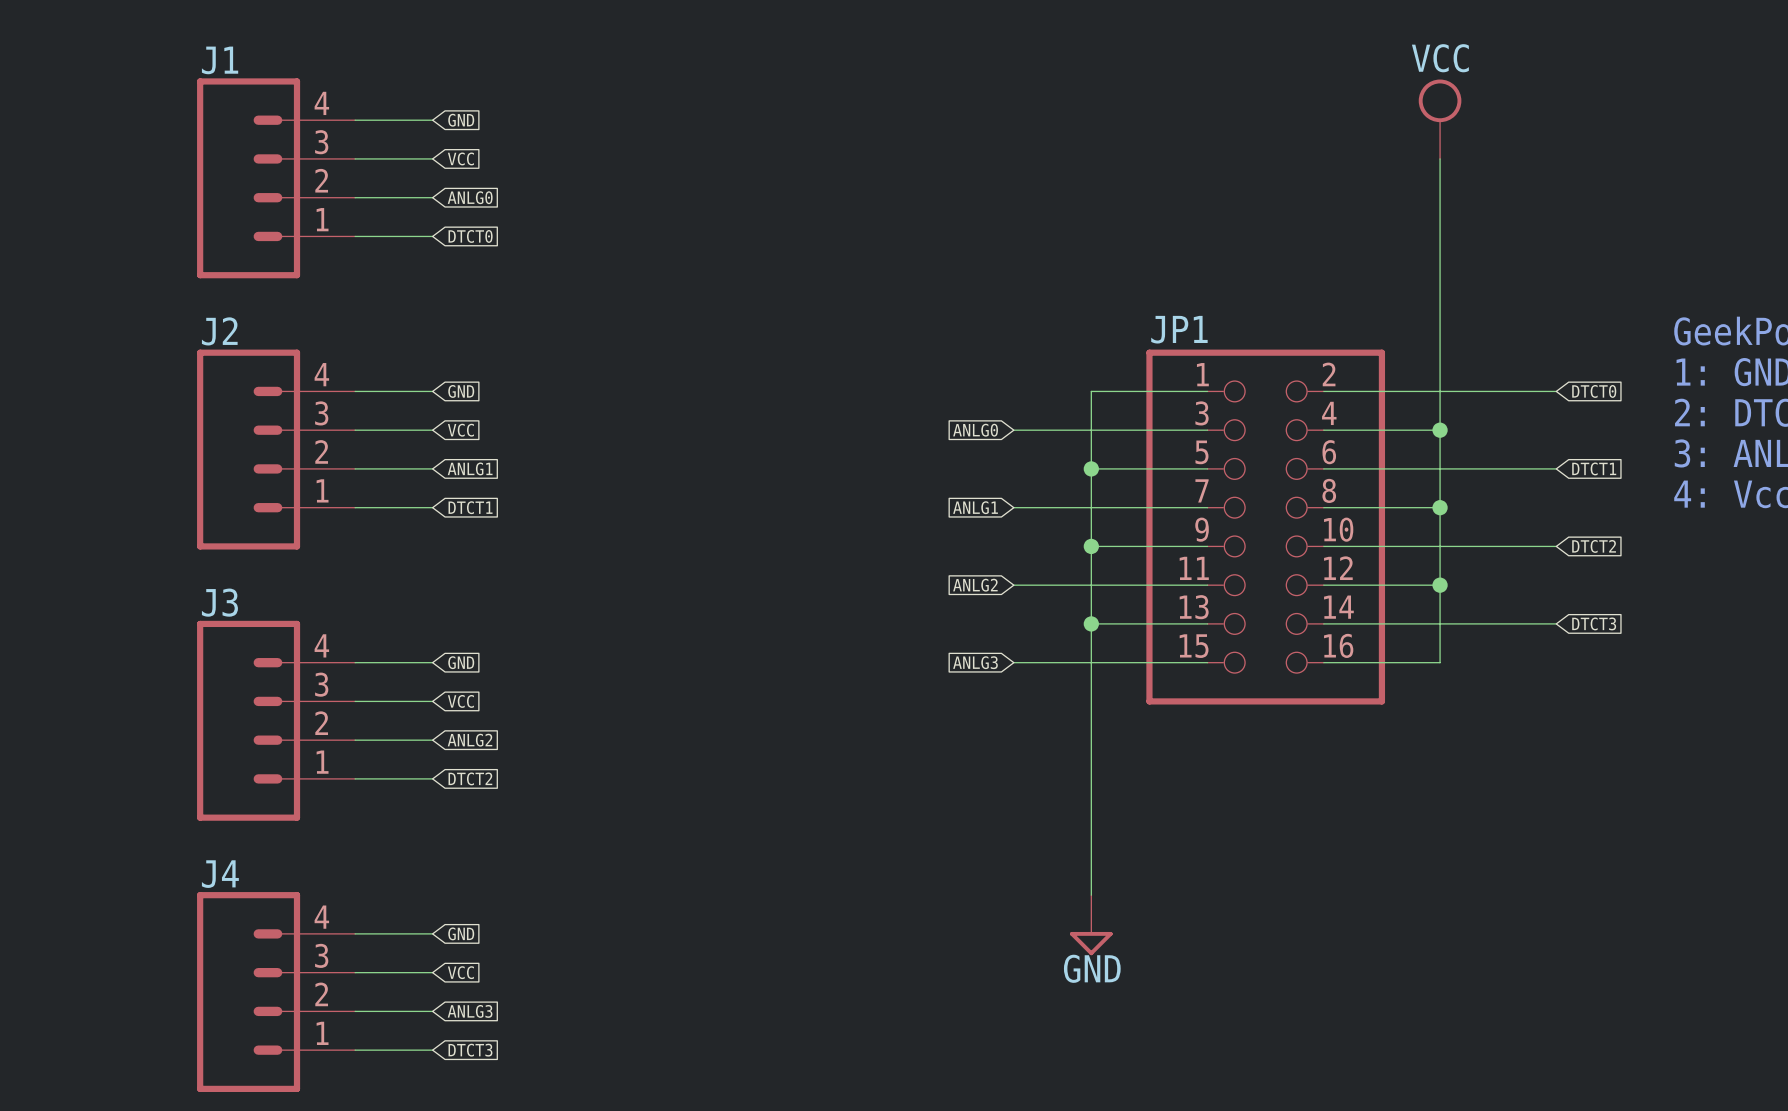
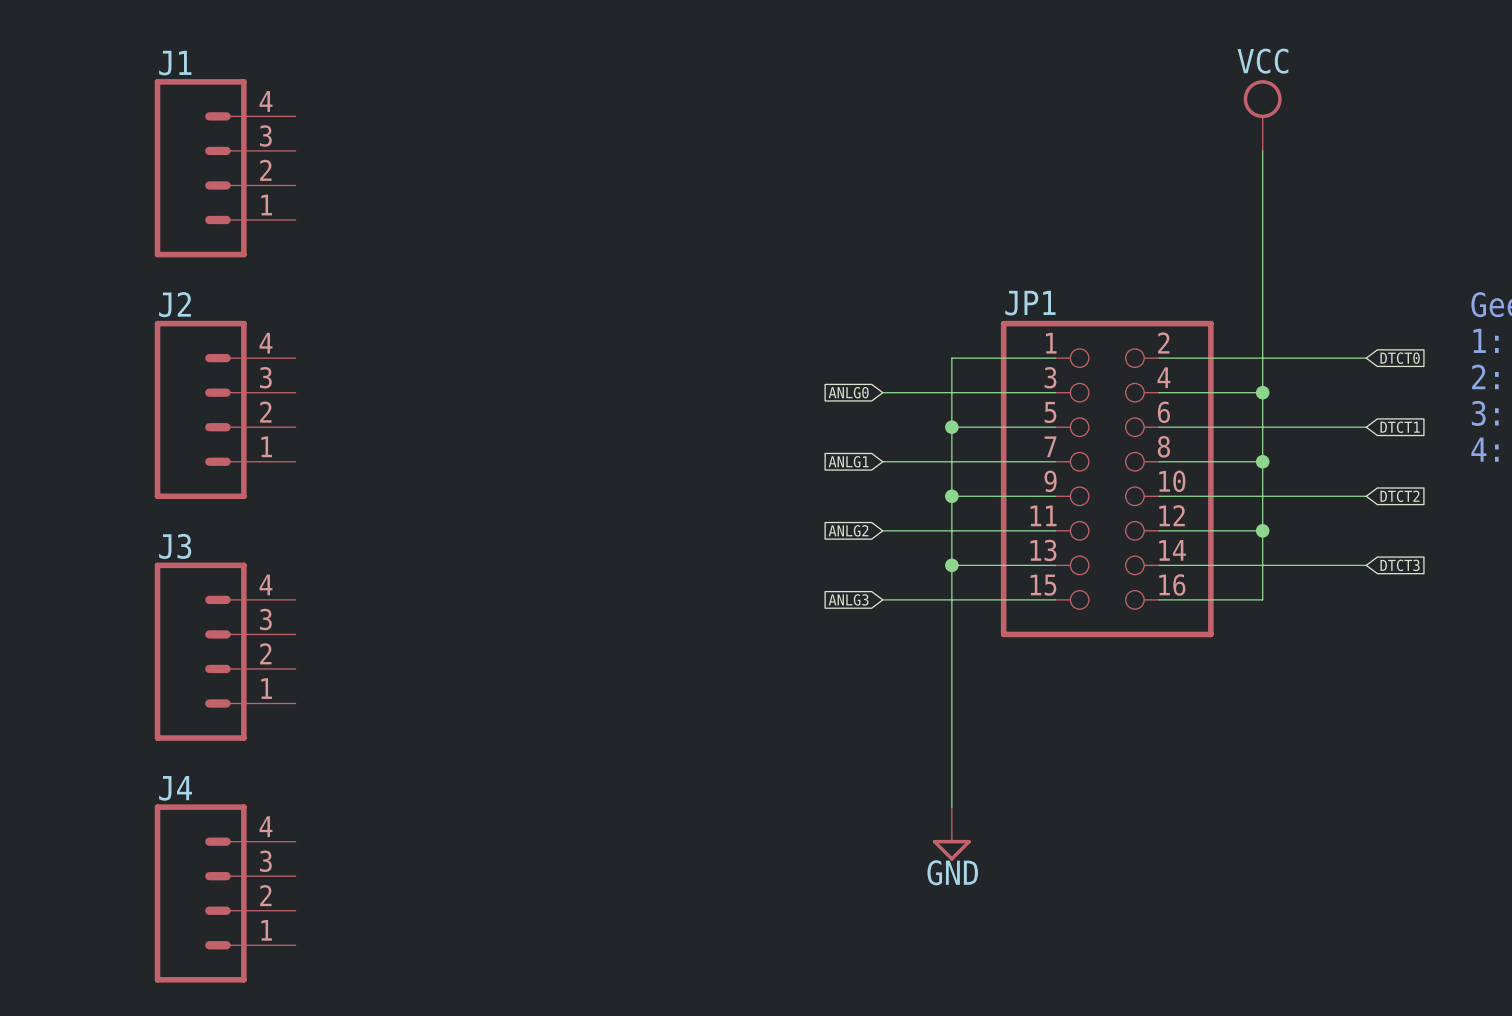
wire: (355, 120) (432, 120) -> none
global label: GND (461, 120) -> none
wire: (355, 158) (432, 158) -> none
global label: VCC (460, 158) -> none
wire: (355, 197) (432, 197) -> none
global label: ANLG0 (470, 197) -> none
wire: (355, 236) (432, 236) -> none
global label: DTCT0 (470, 236) -> none
wire: (355, 391) (432, 391) -> none
global label: GND (461, 391) -> none
wire: (355, 430) (432, 430) -> none
global label: VCC (460, 430) -> none
wire: (355, 468) (432, 468) -> none
global label: ANLG1 (470, 468) -> none
wire: (355, 507) (432, 507) -> none
global label: DTCT1 (470, 507) -> none
wire: (355, 662) (432, 662) -> none
global label: GND (461, 662) -> none
wire: (355, 701) (432, 701) -> none
global label: VCC (460, 701) -> none
wire: (355, 740) (432, 740) -> none
global label: ANLG2 (470, 740) -> none
wire: (355, 778) (432, 778) -> none
global label: DTCT2 (470, 778) -> none
wire: (355, 933) (432, 933) -> none
global label: GND (461, 933) -> none
wire: (355, 972) (432, 972) -> none
global label: VCC (460, 972) -> none
wire: (355, 1011) (432, 1011) -> none
global label: ANLG3 (470, 1011) -> none
wire: (355, 1050) (432, 1050) -> none
global label: DTCT3 (470, 1050) -> none

